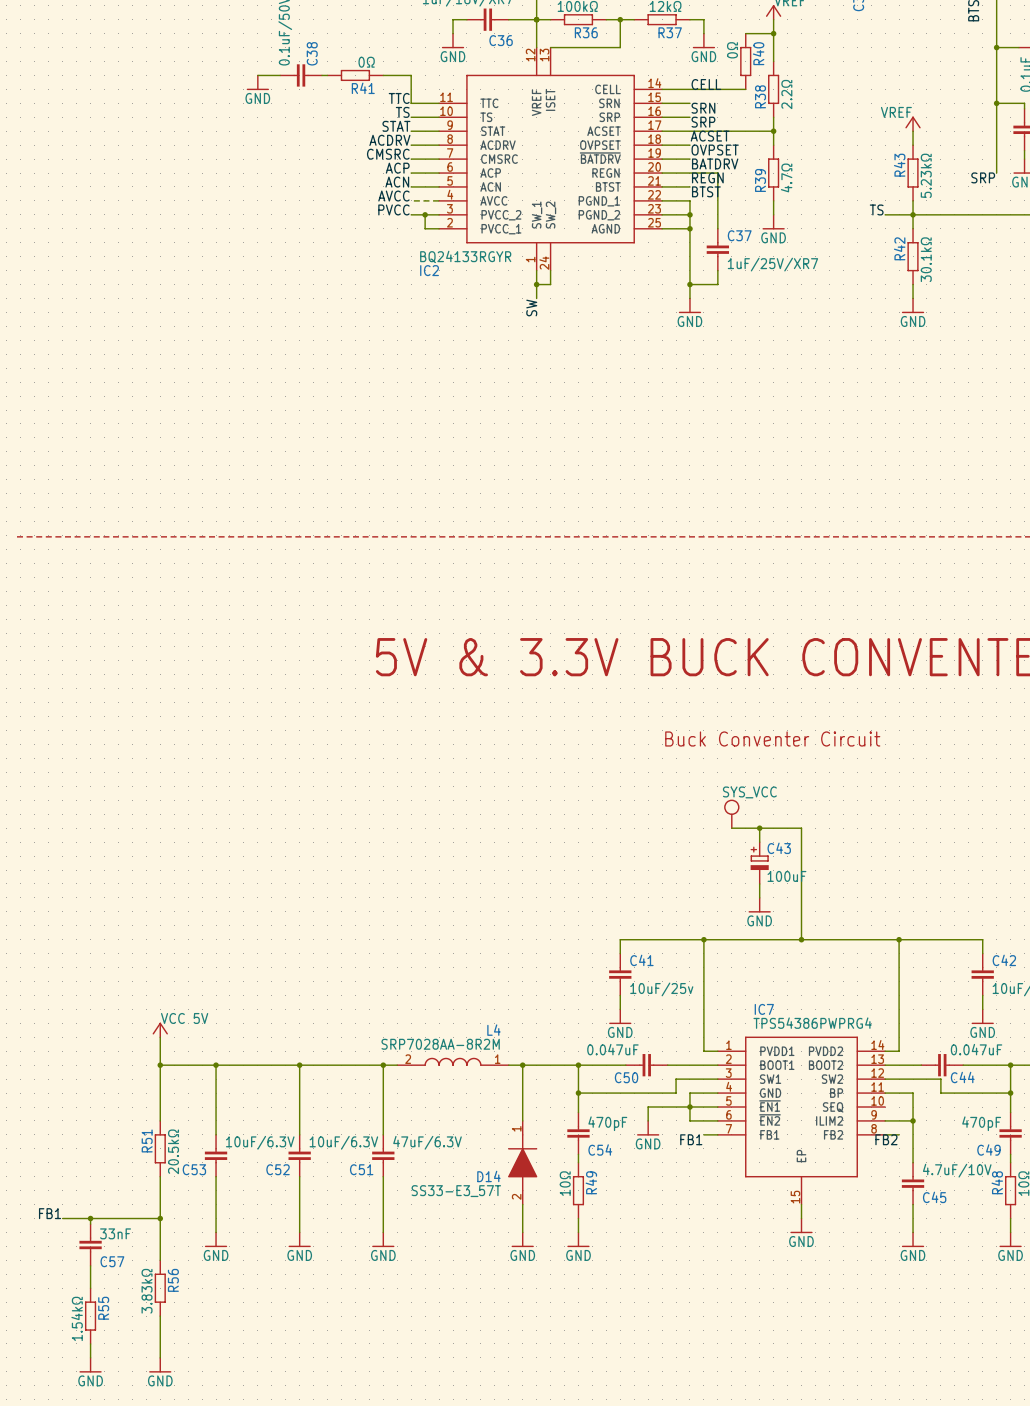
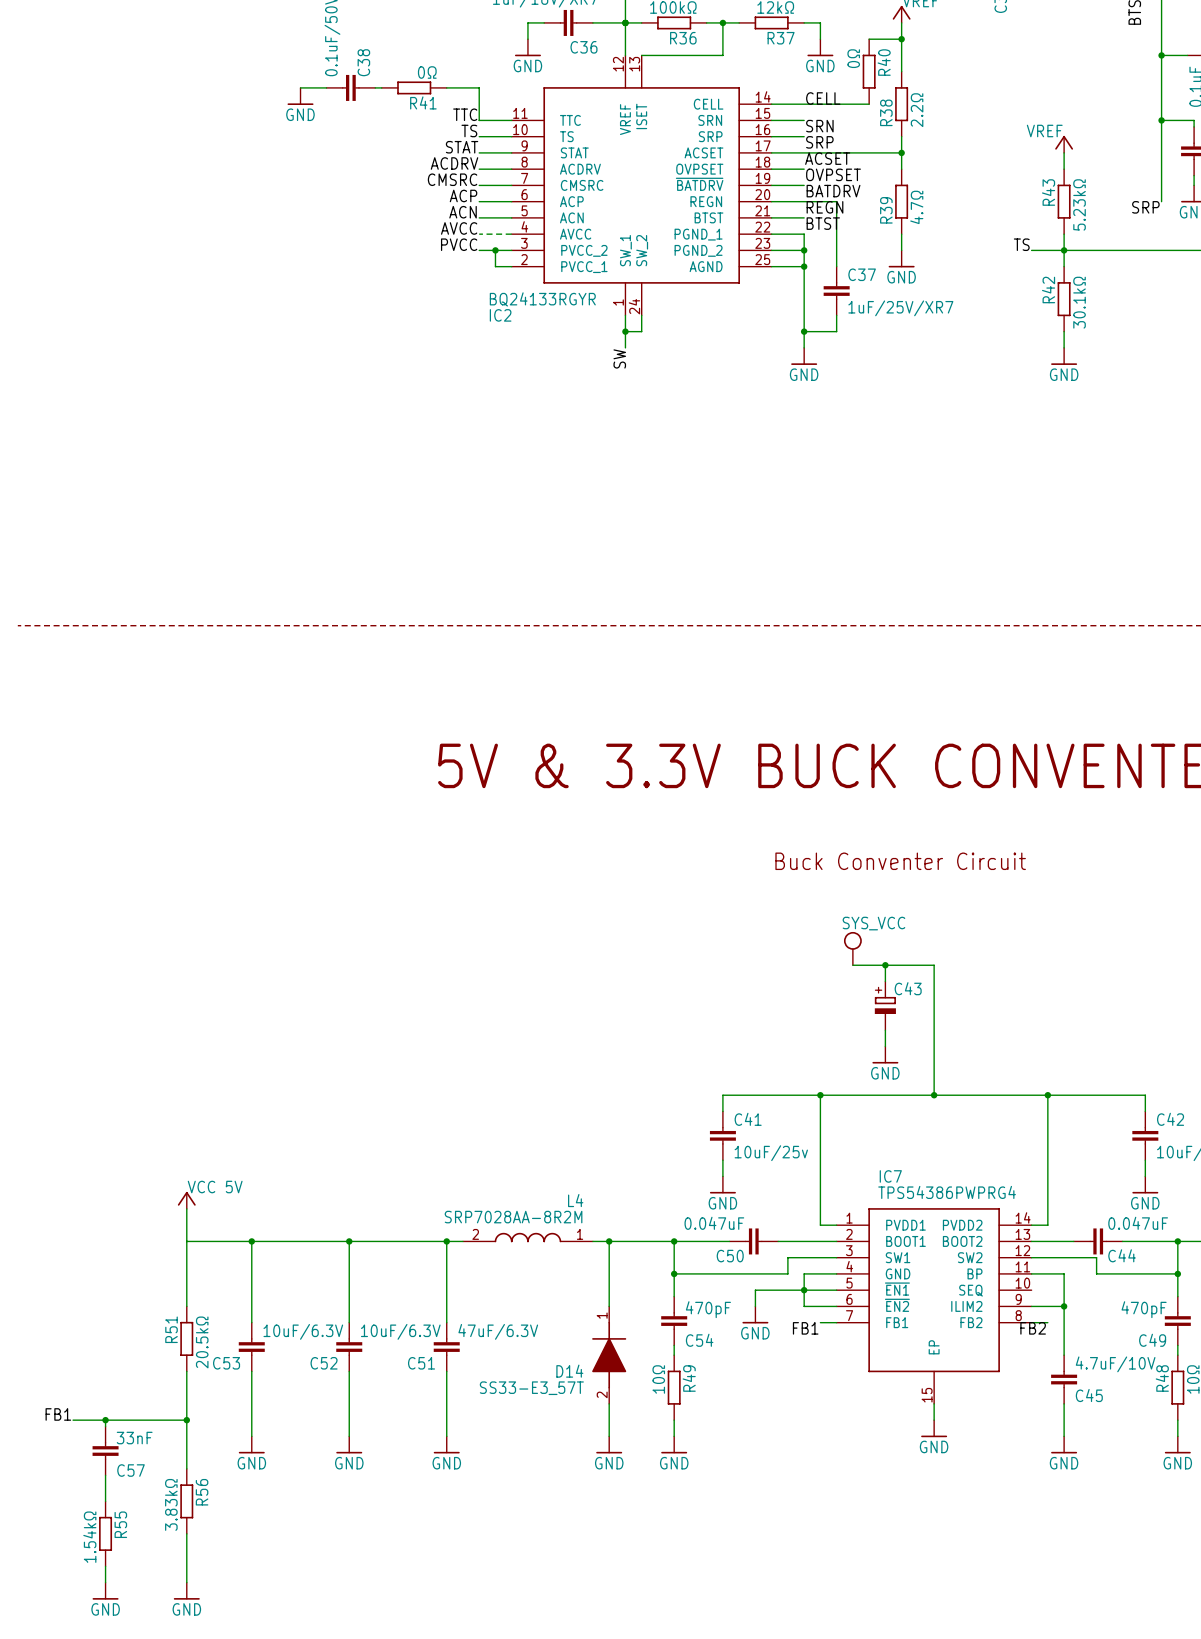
C43 value: 100uF (786, 876) -> none
junction: (160, 1065) -> none

